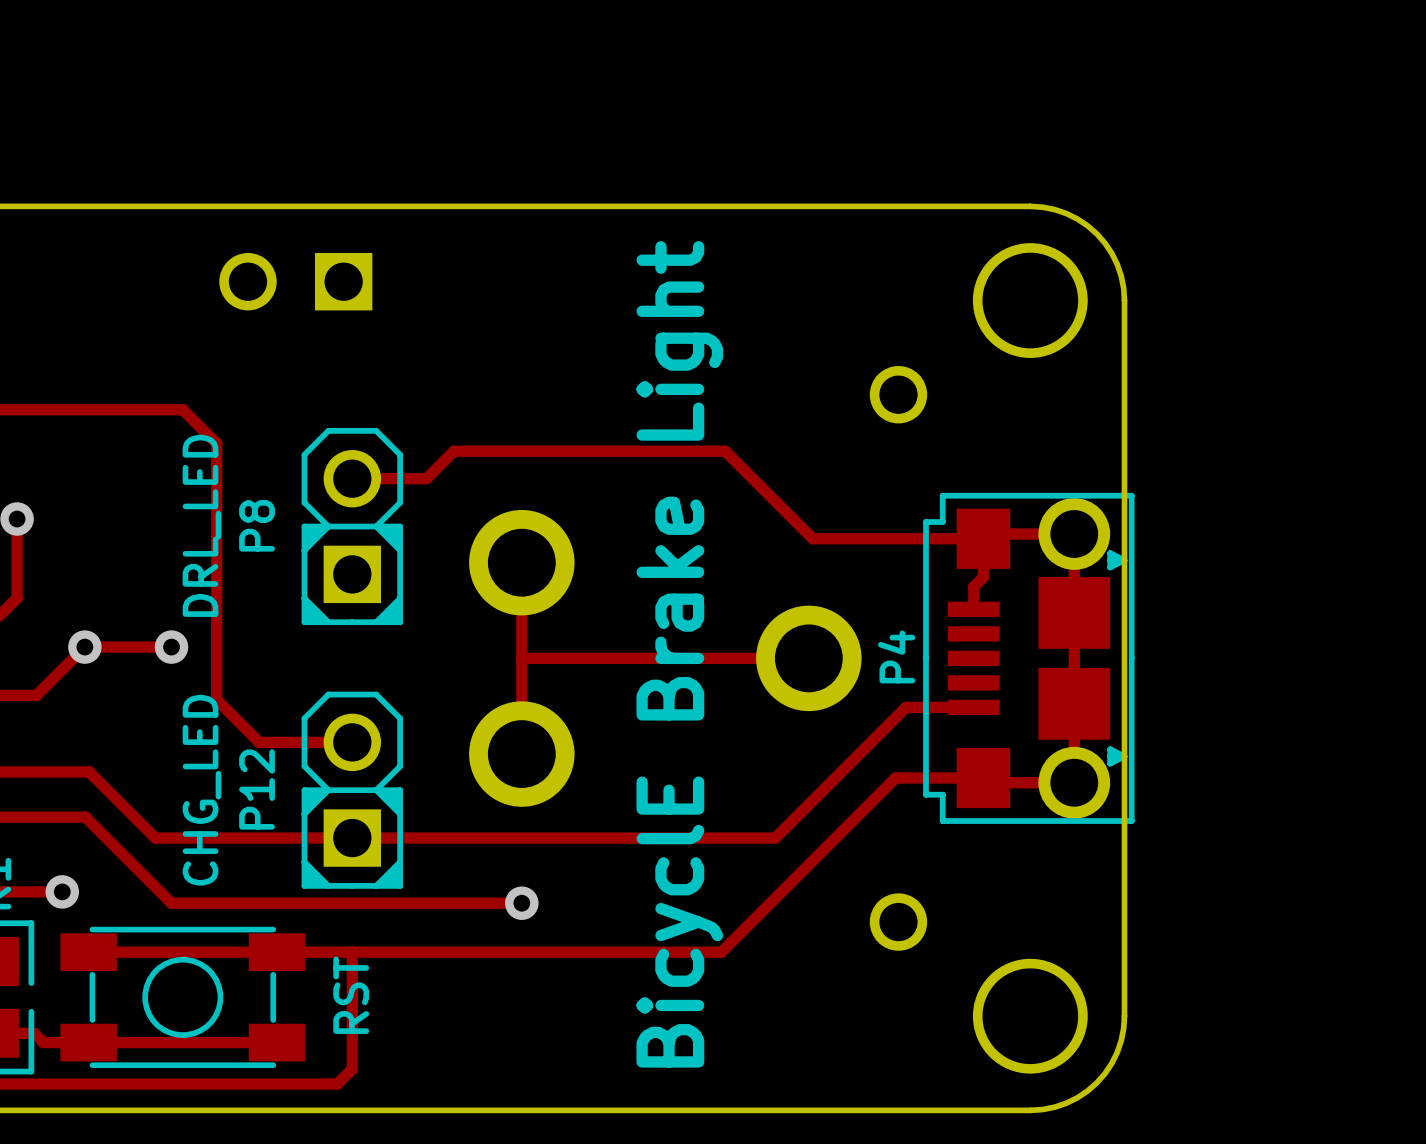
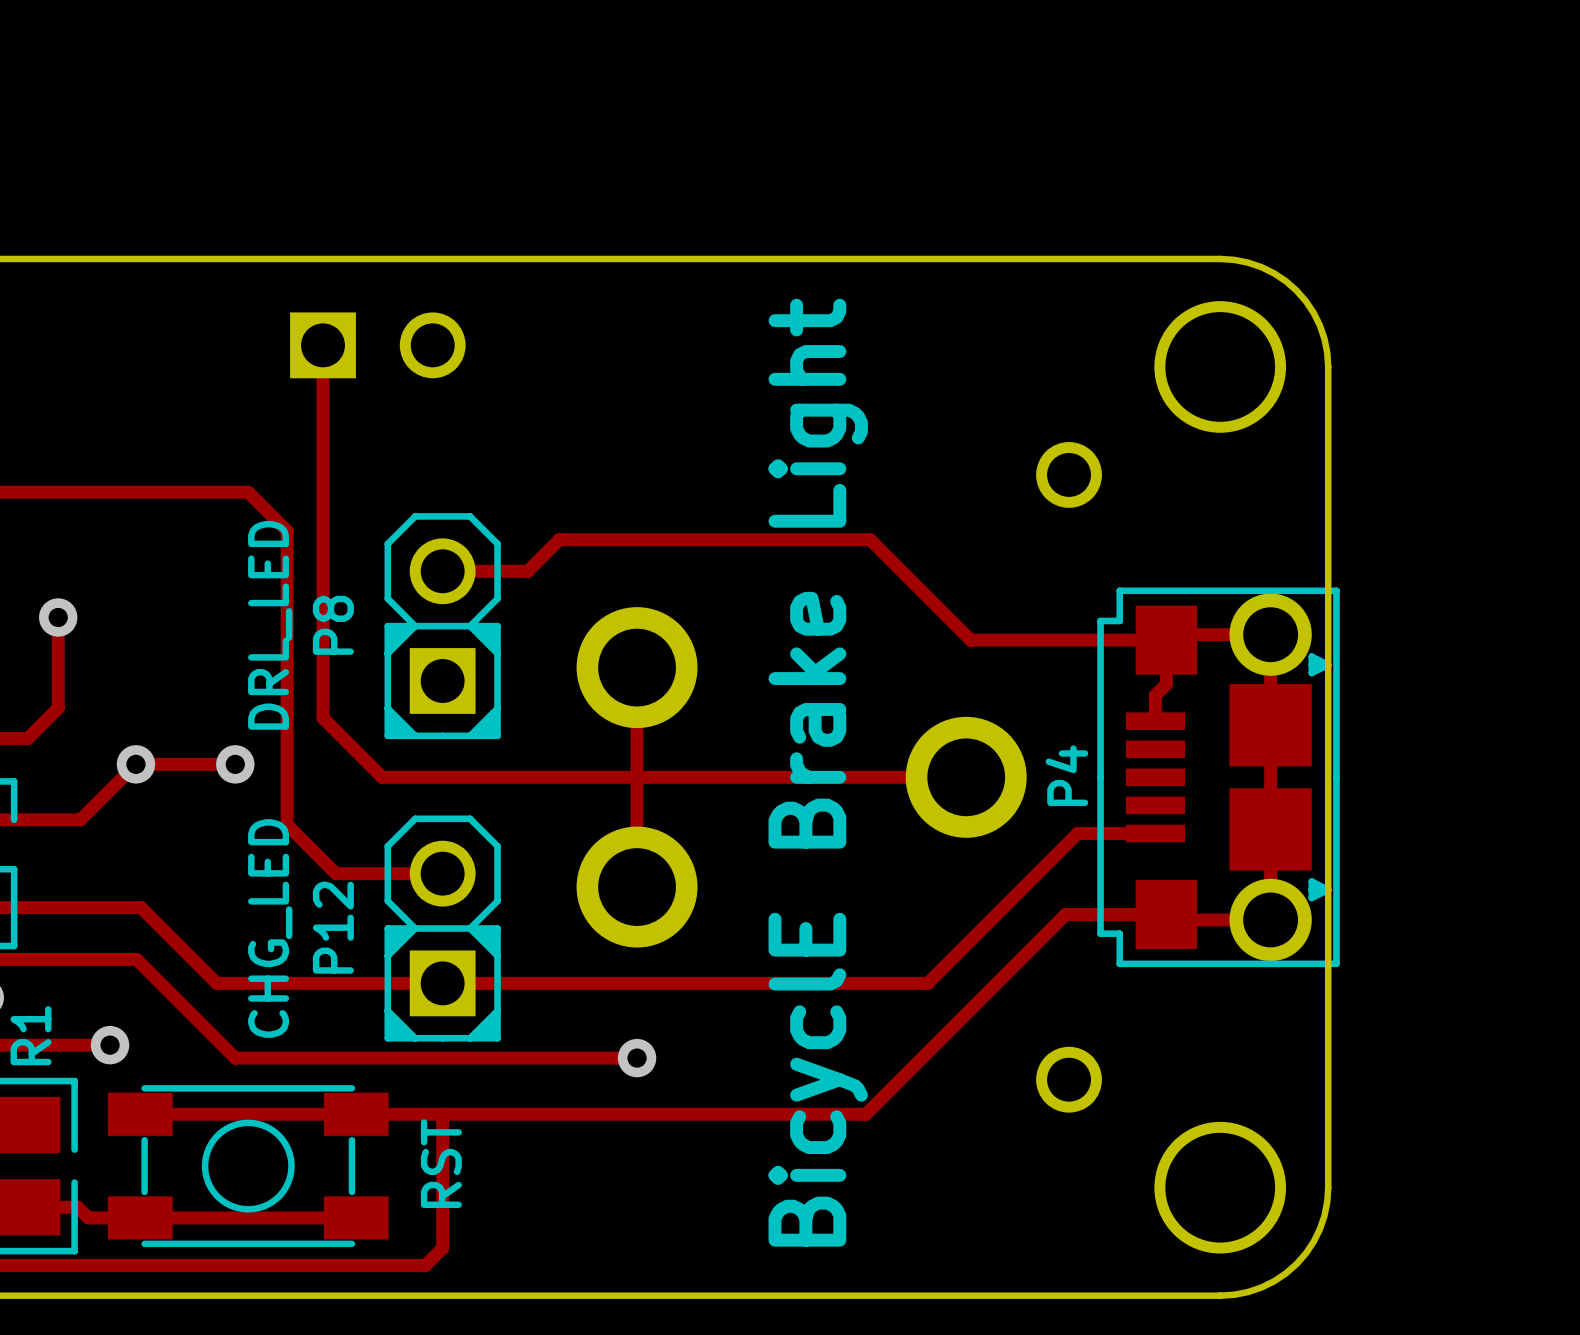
track: none -> (323, 345) (323, 718) (382, 777) (637, 777)
part rotation: 0° (295, 281) -> 180° (377, 345)

